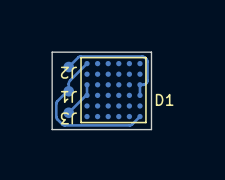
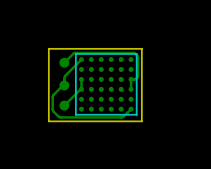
J2 name: J2 (68, 72) -> none
J1 name: J1 (68, 96) -> none
D1 name: D1 (164, 99) -> none
J3 name: J3 (68, 118) -> none

